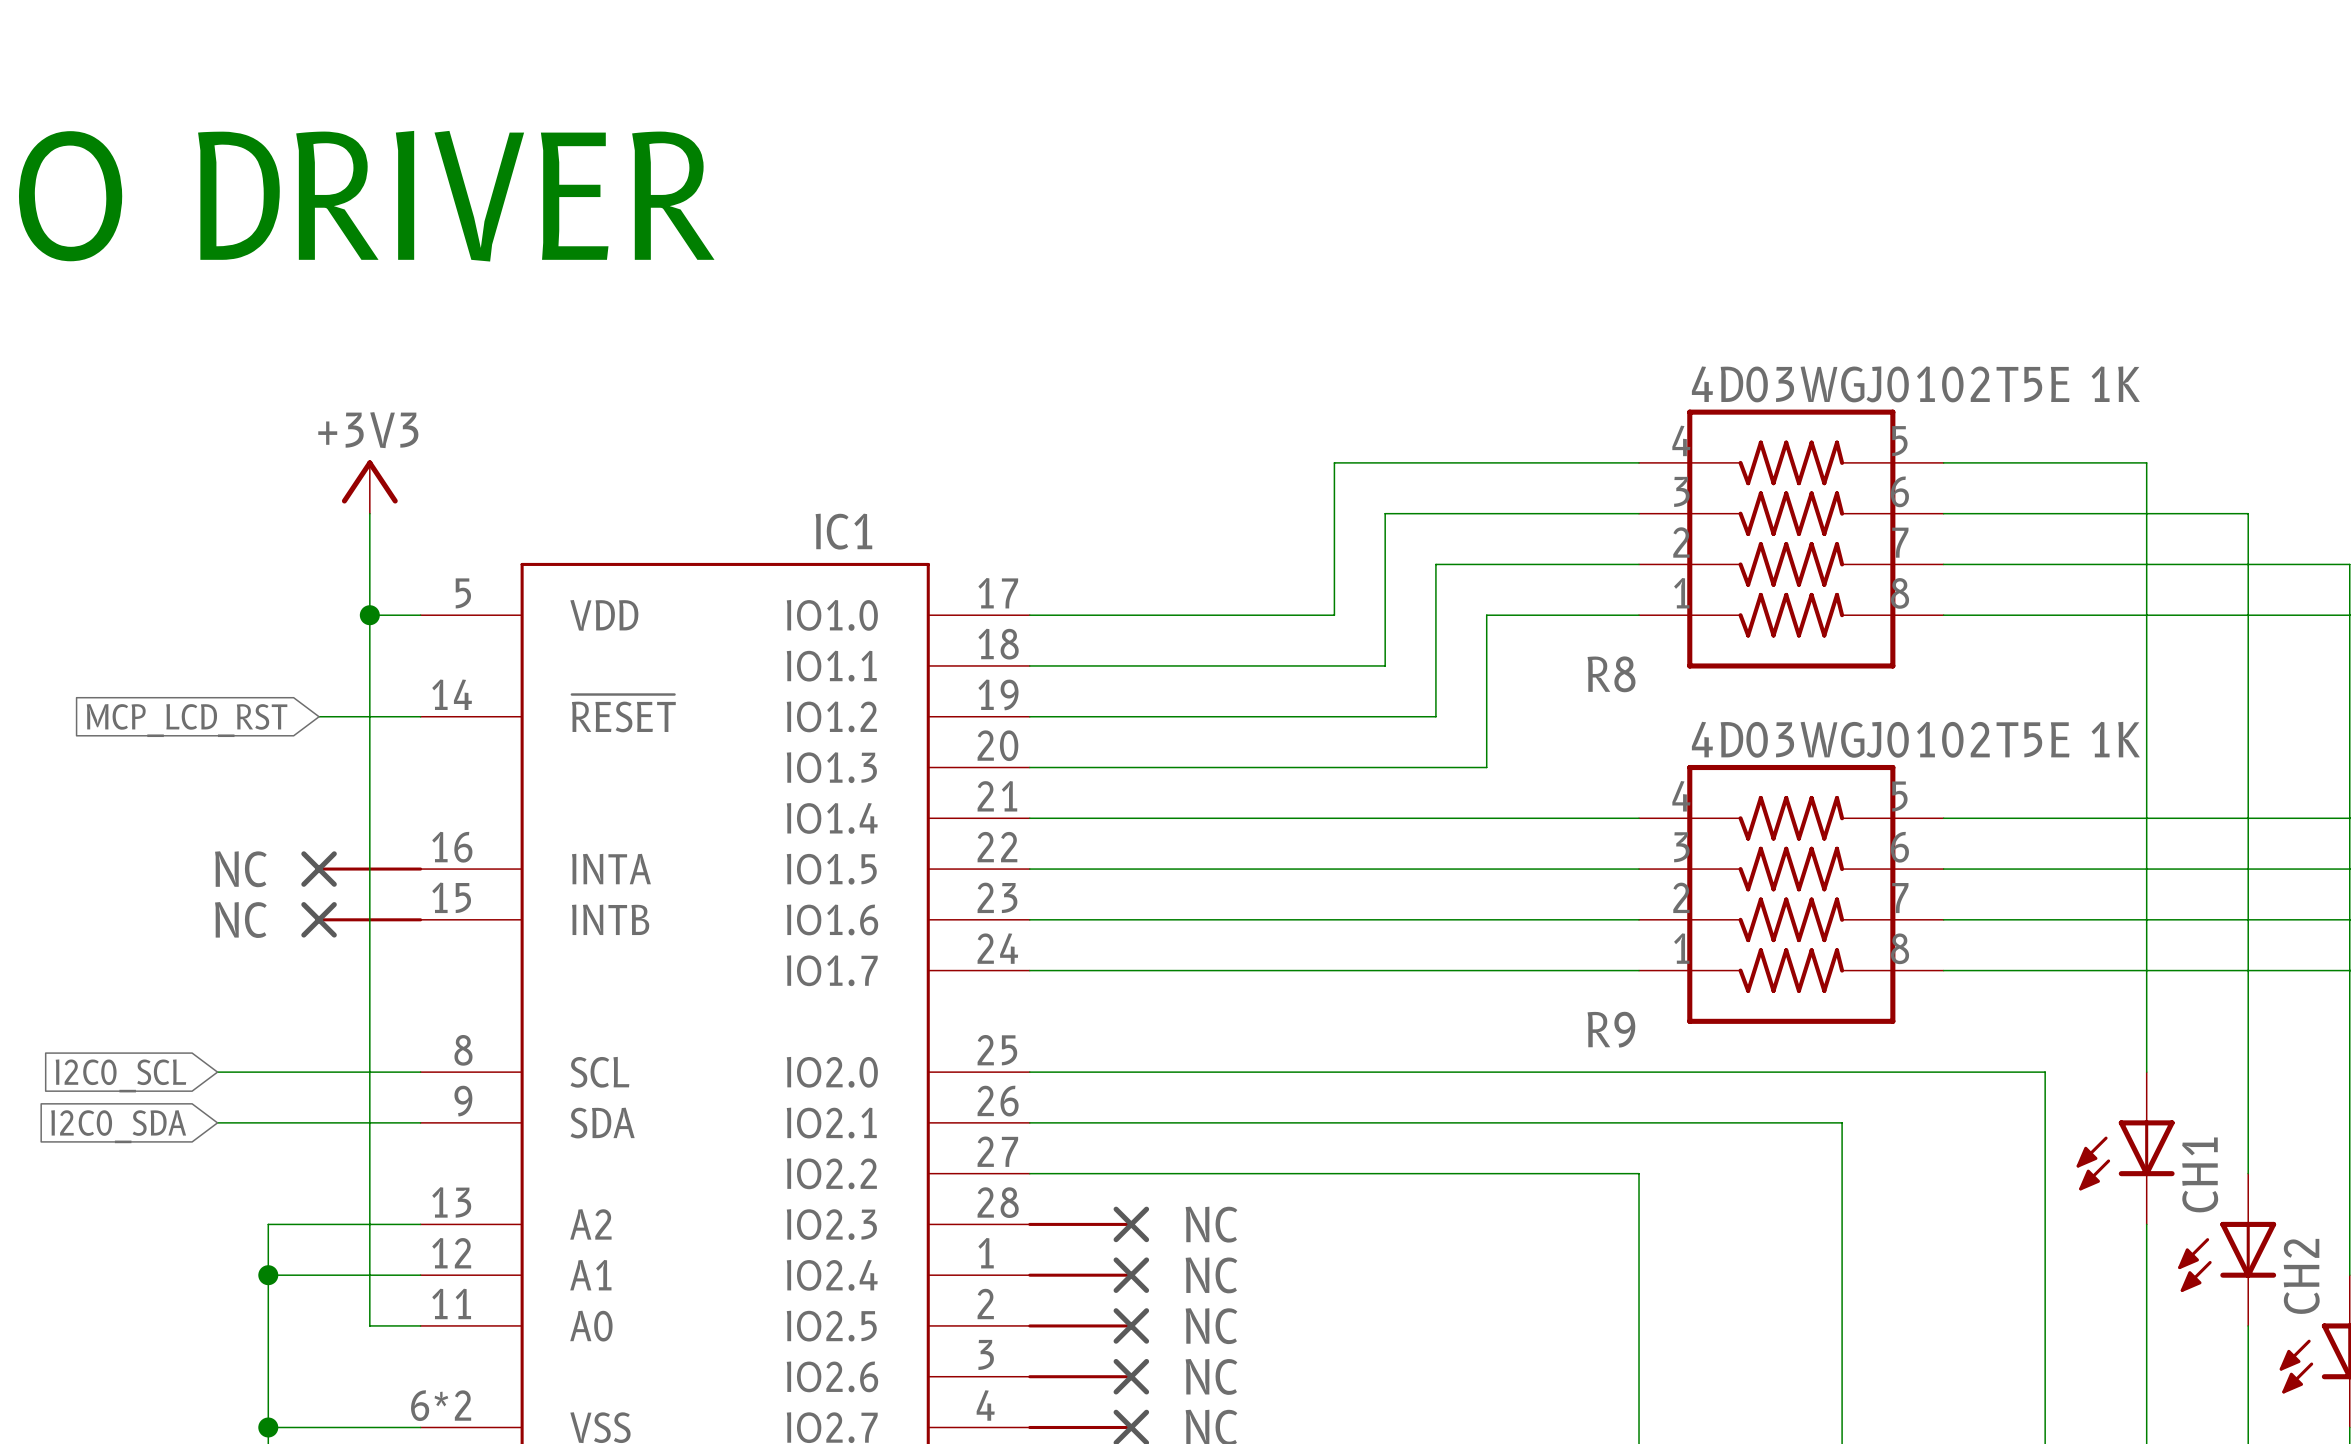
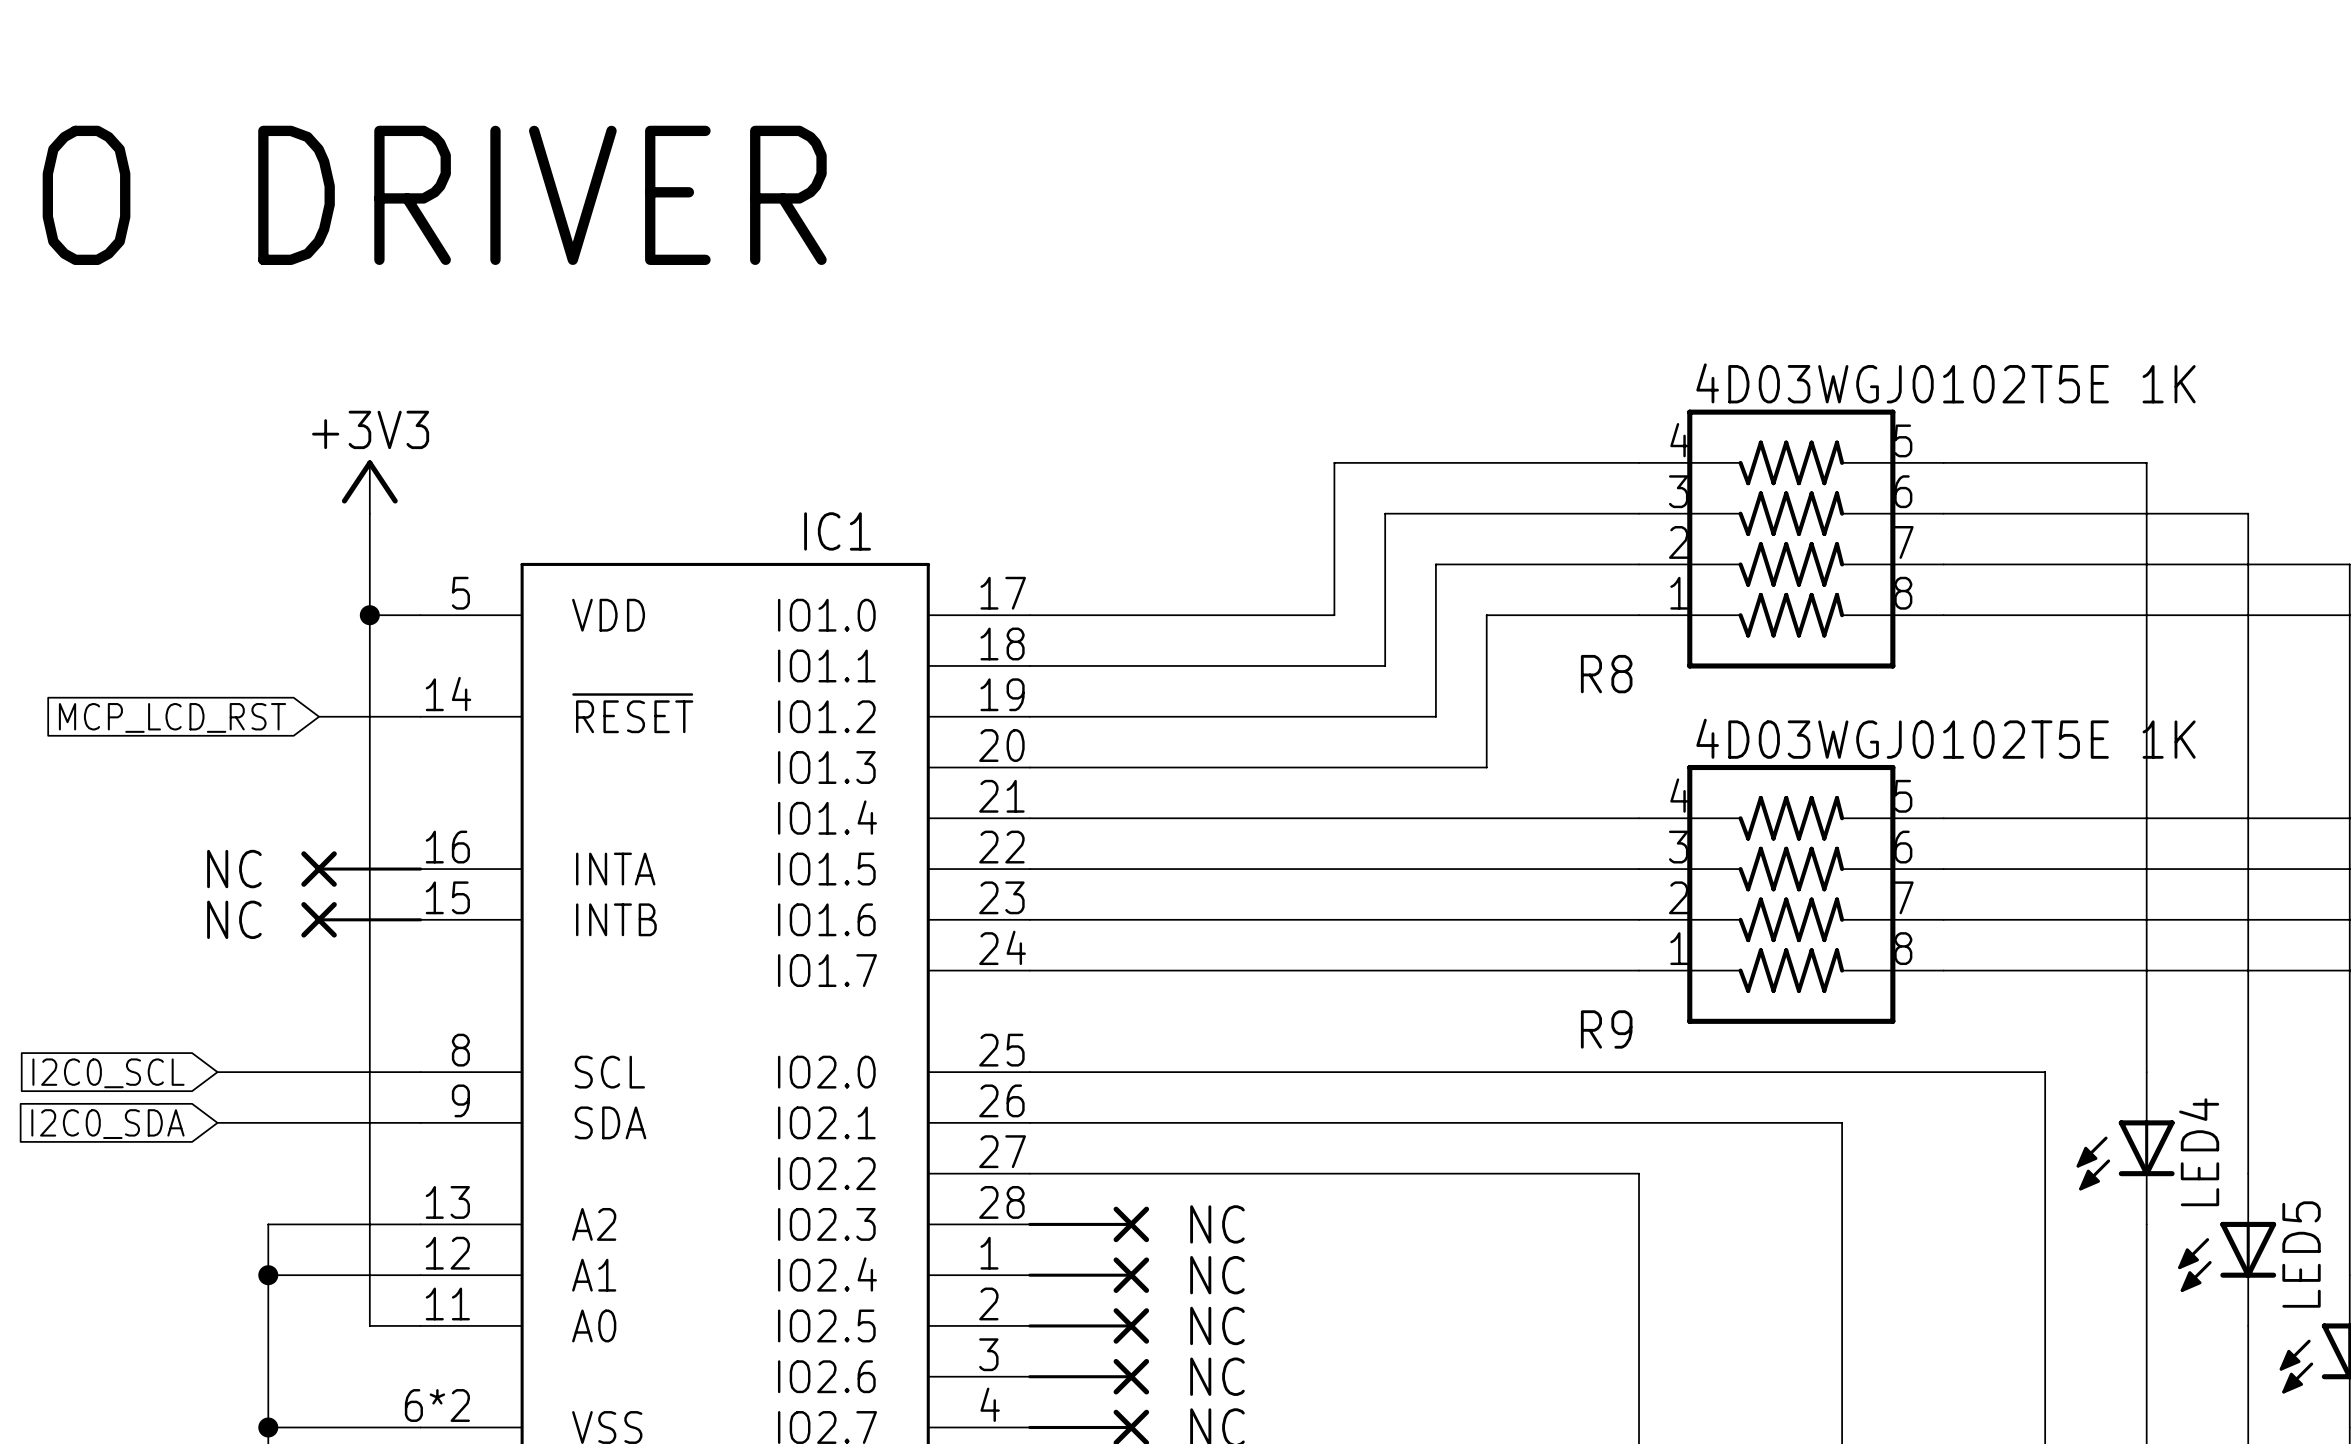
CH1 name: CH1 (2200, 1174) -> LED4 (2199, 1152)
CH2 name: CH2 (2301, 1276) -> LED5 (2301, 1254)

